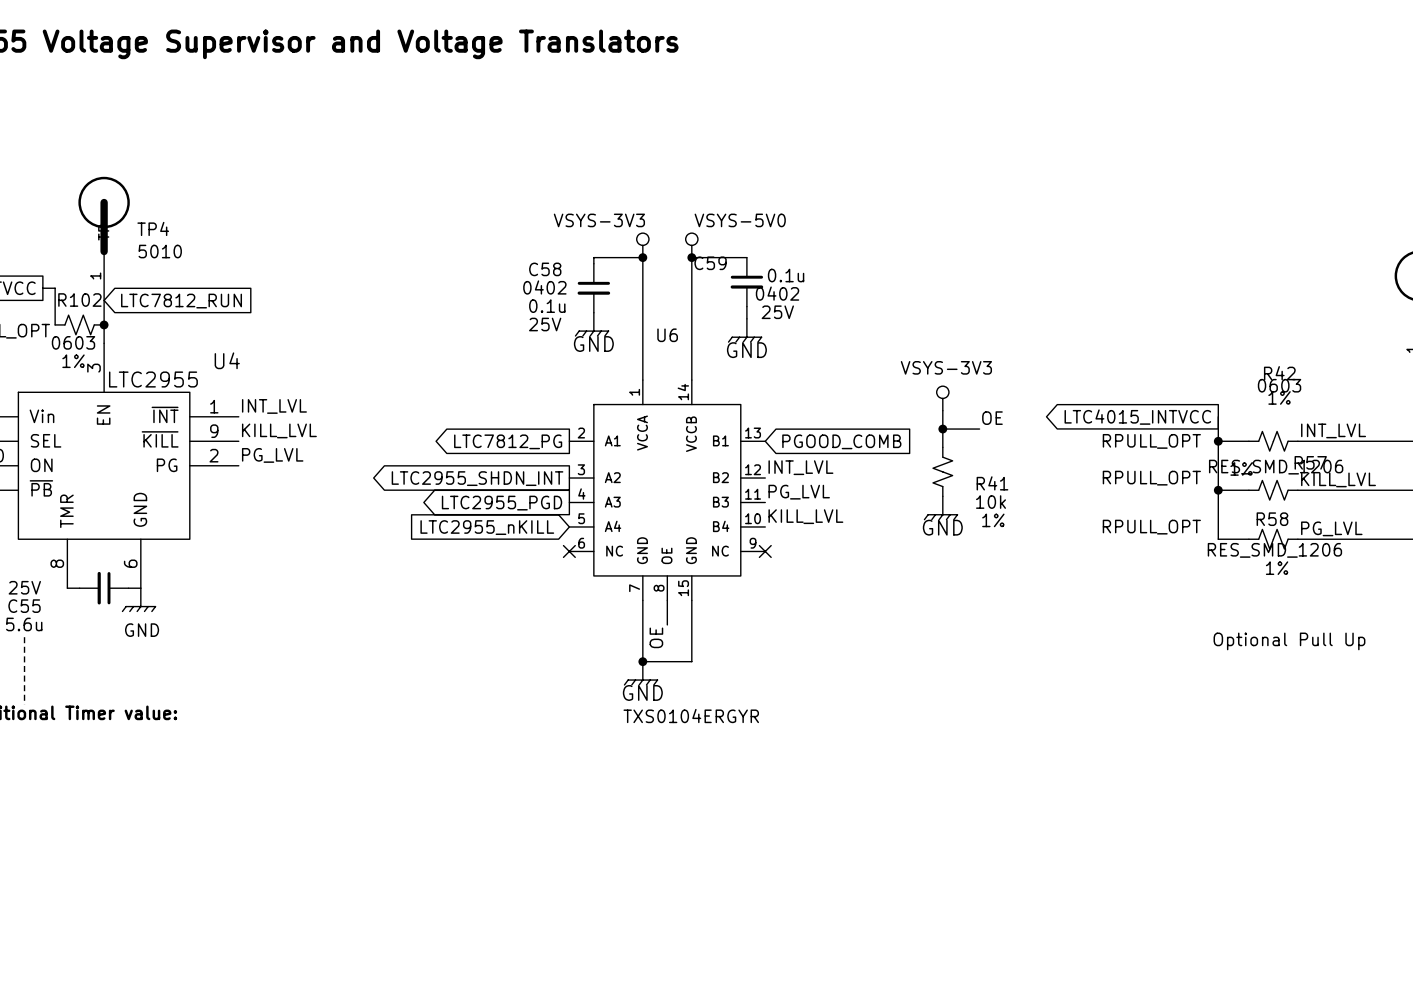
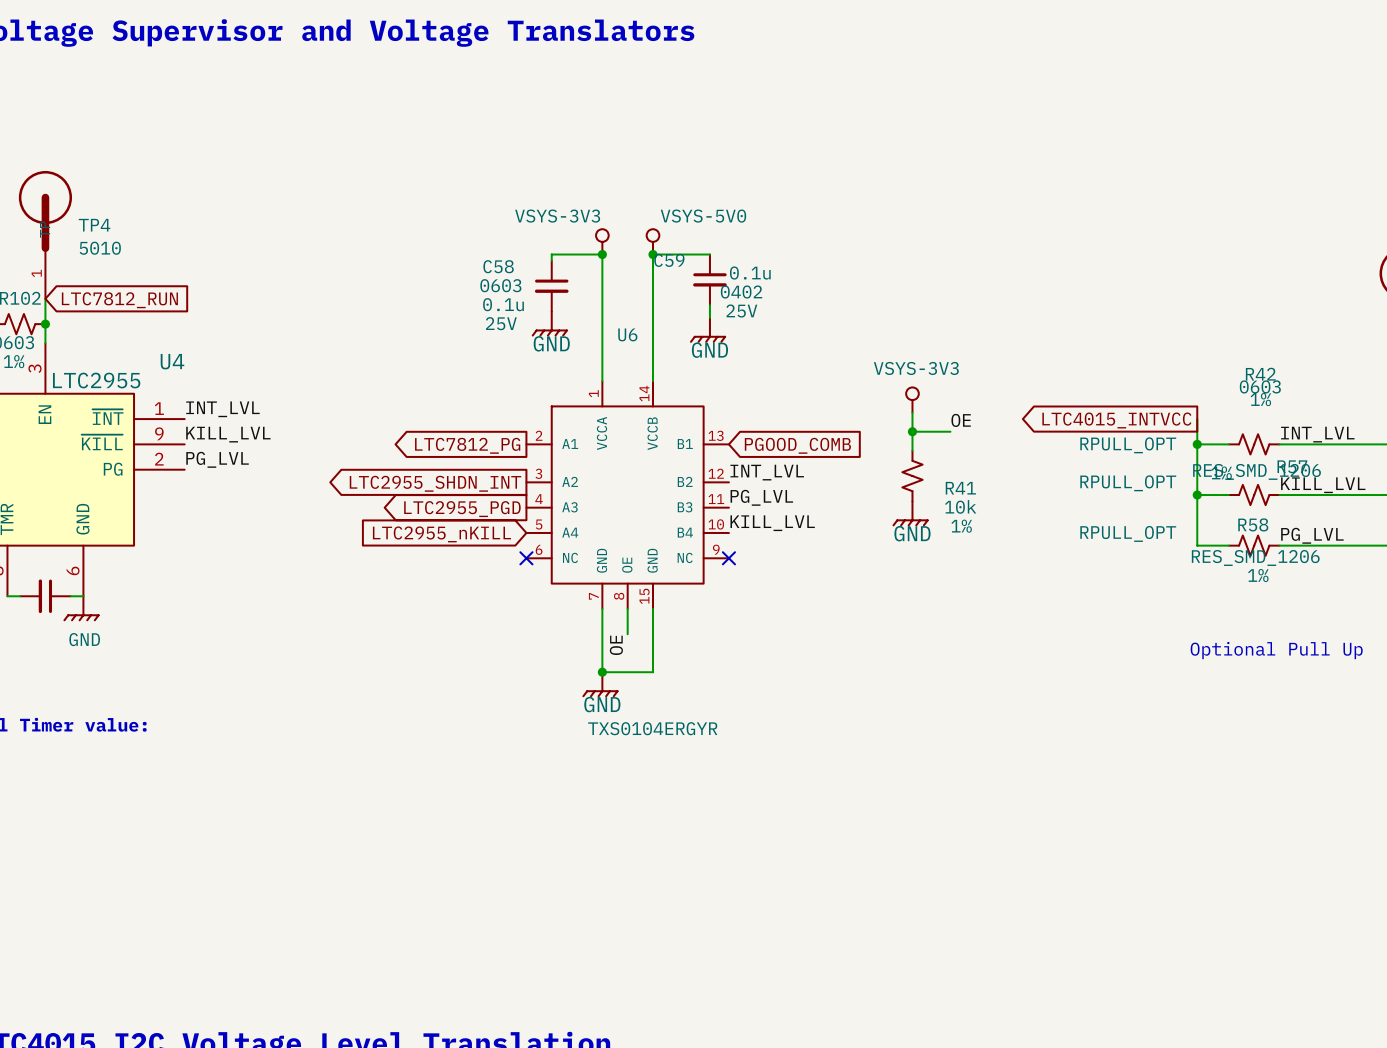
C58 text: 0402 (544, 287) -> 0603 (500, 285)

